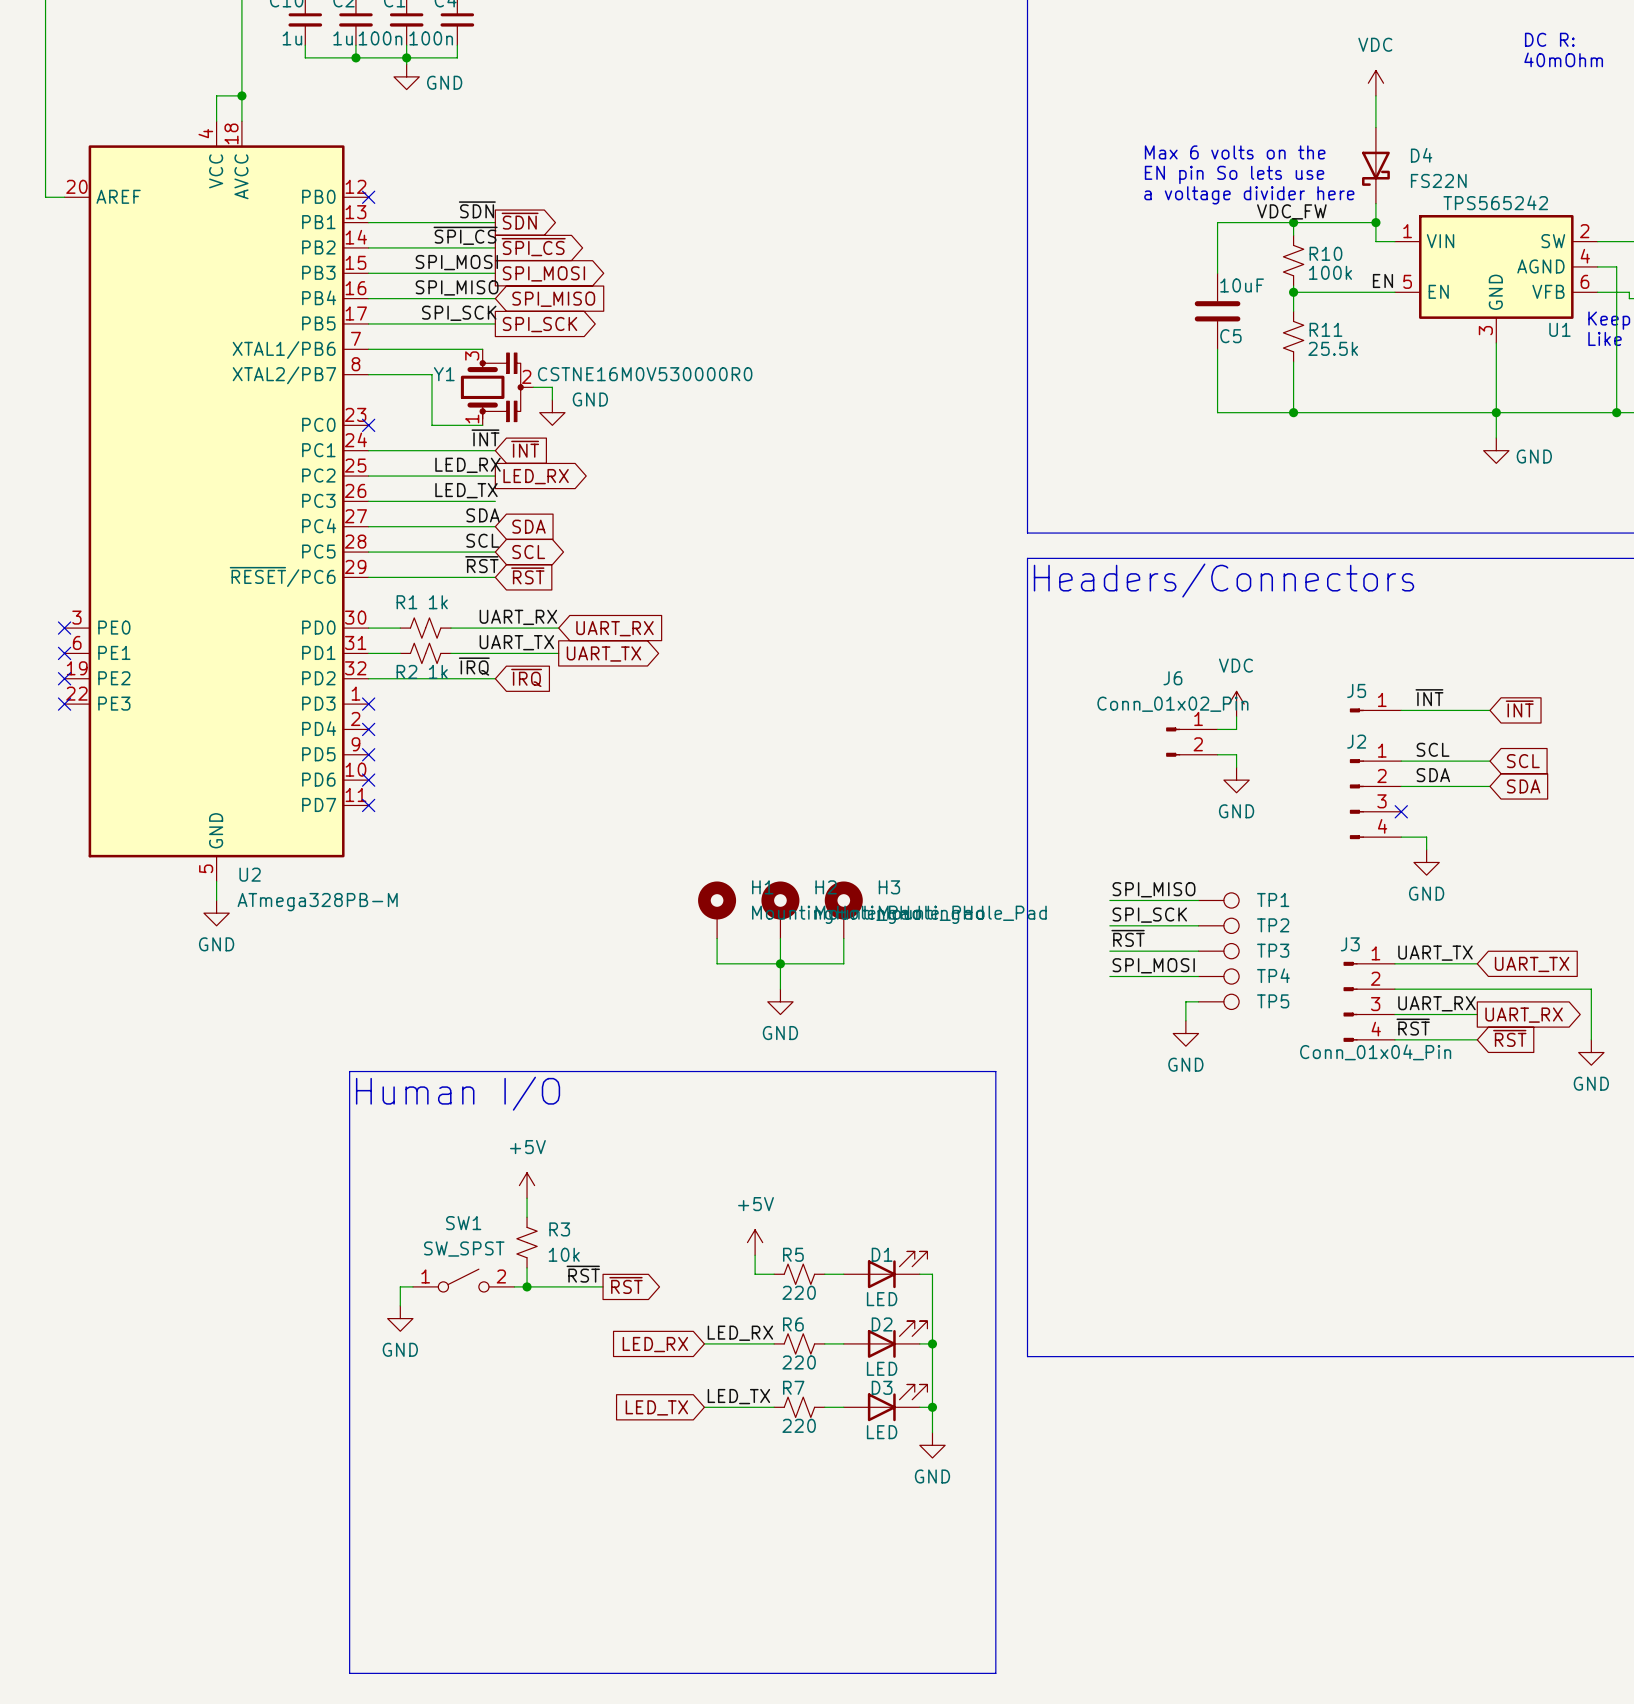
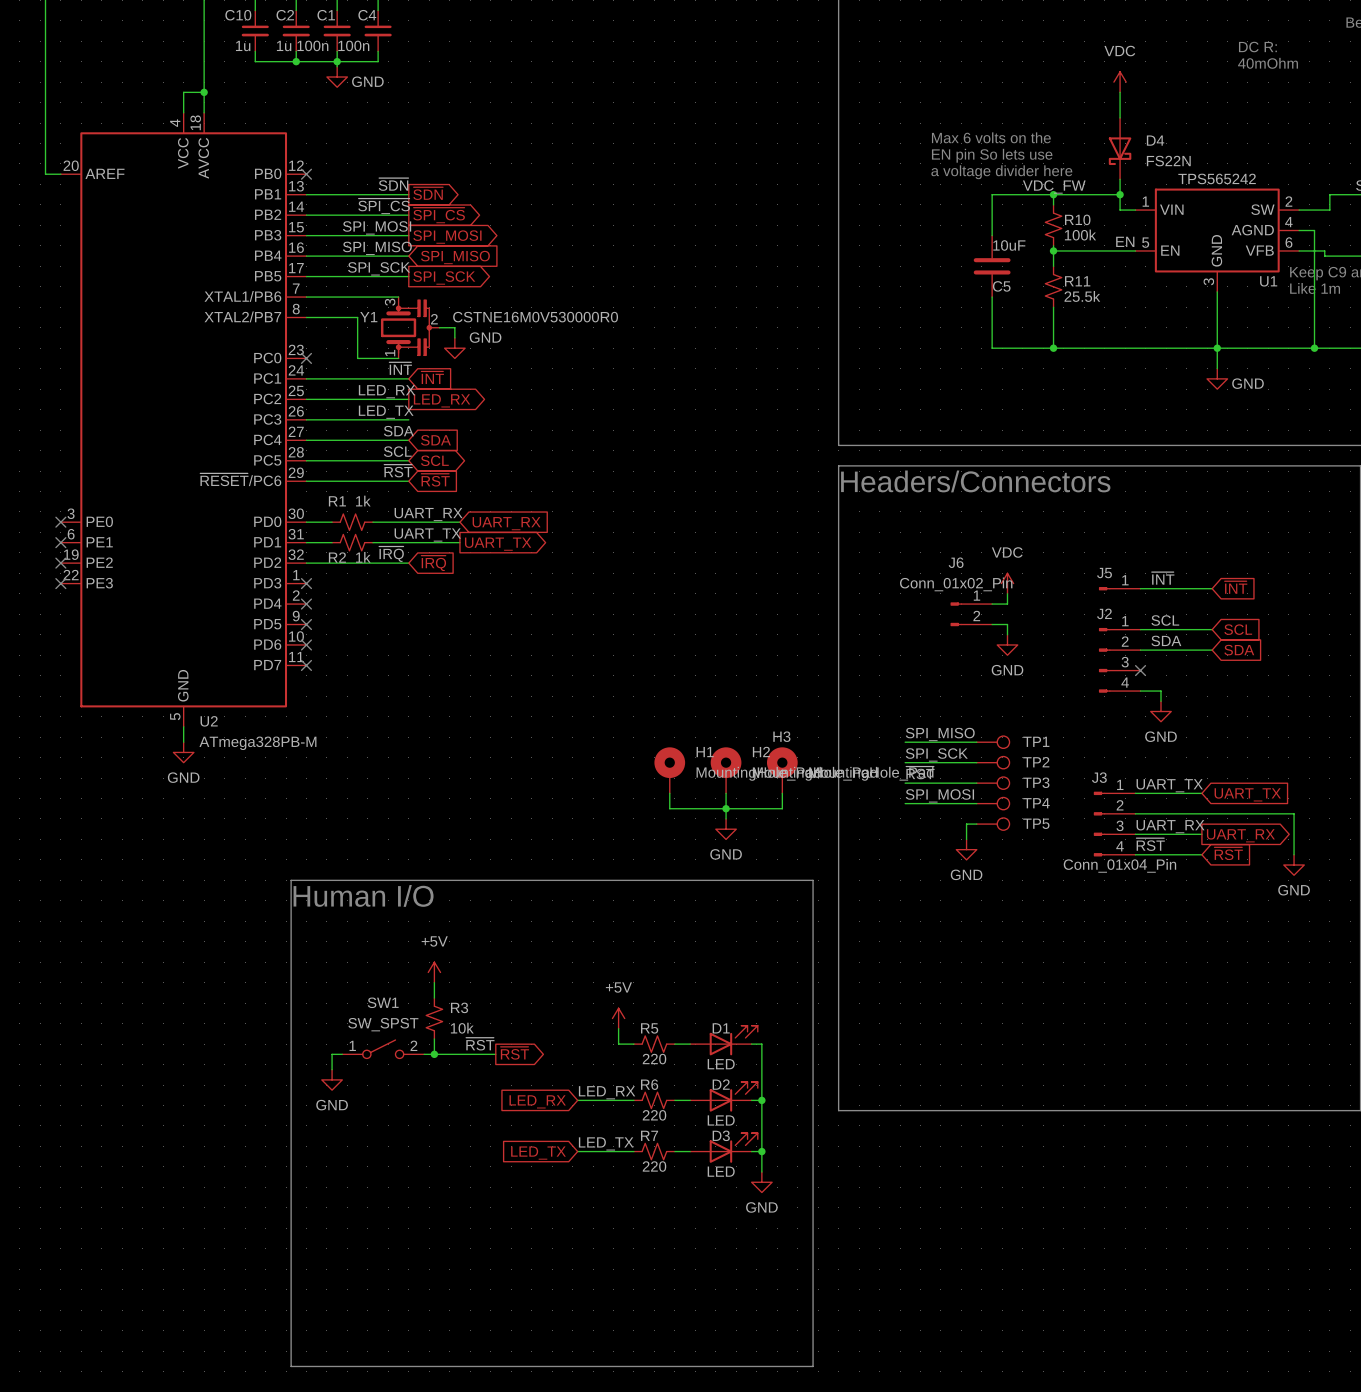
H3 name position: H3 (889, 887) -> H3 (781, 736)
H1 position: (717, 909) -> (669, 770)
H2 position: (780, 909) -> (726, 770)
H3 position: (843, 909) -> (782, 770)
wire: (717, 938) (717, 963) (843, 963) (843, 938) -> none
wire: (780, 938) (780, 989) -> none
junction: (780, 963) -> none
wire: none -> (669, 793) (669, 808) (782, 808) (782, 793)
wire: none -> (726, 793) (726, 818)
junction: none -> (726, 808)
power symbol position: GND (780, 1001) -> GND (726, 829)

